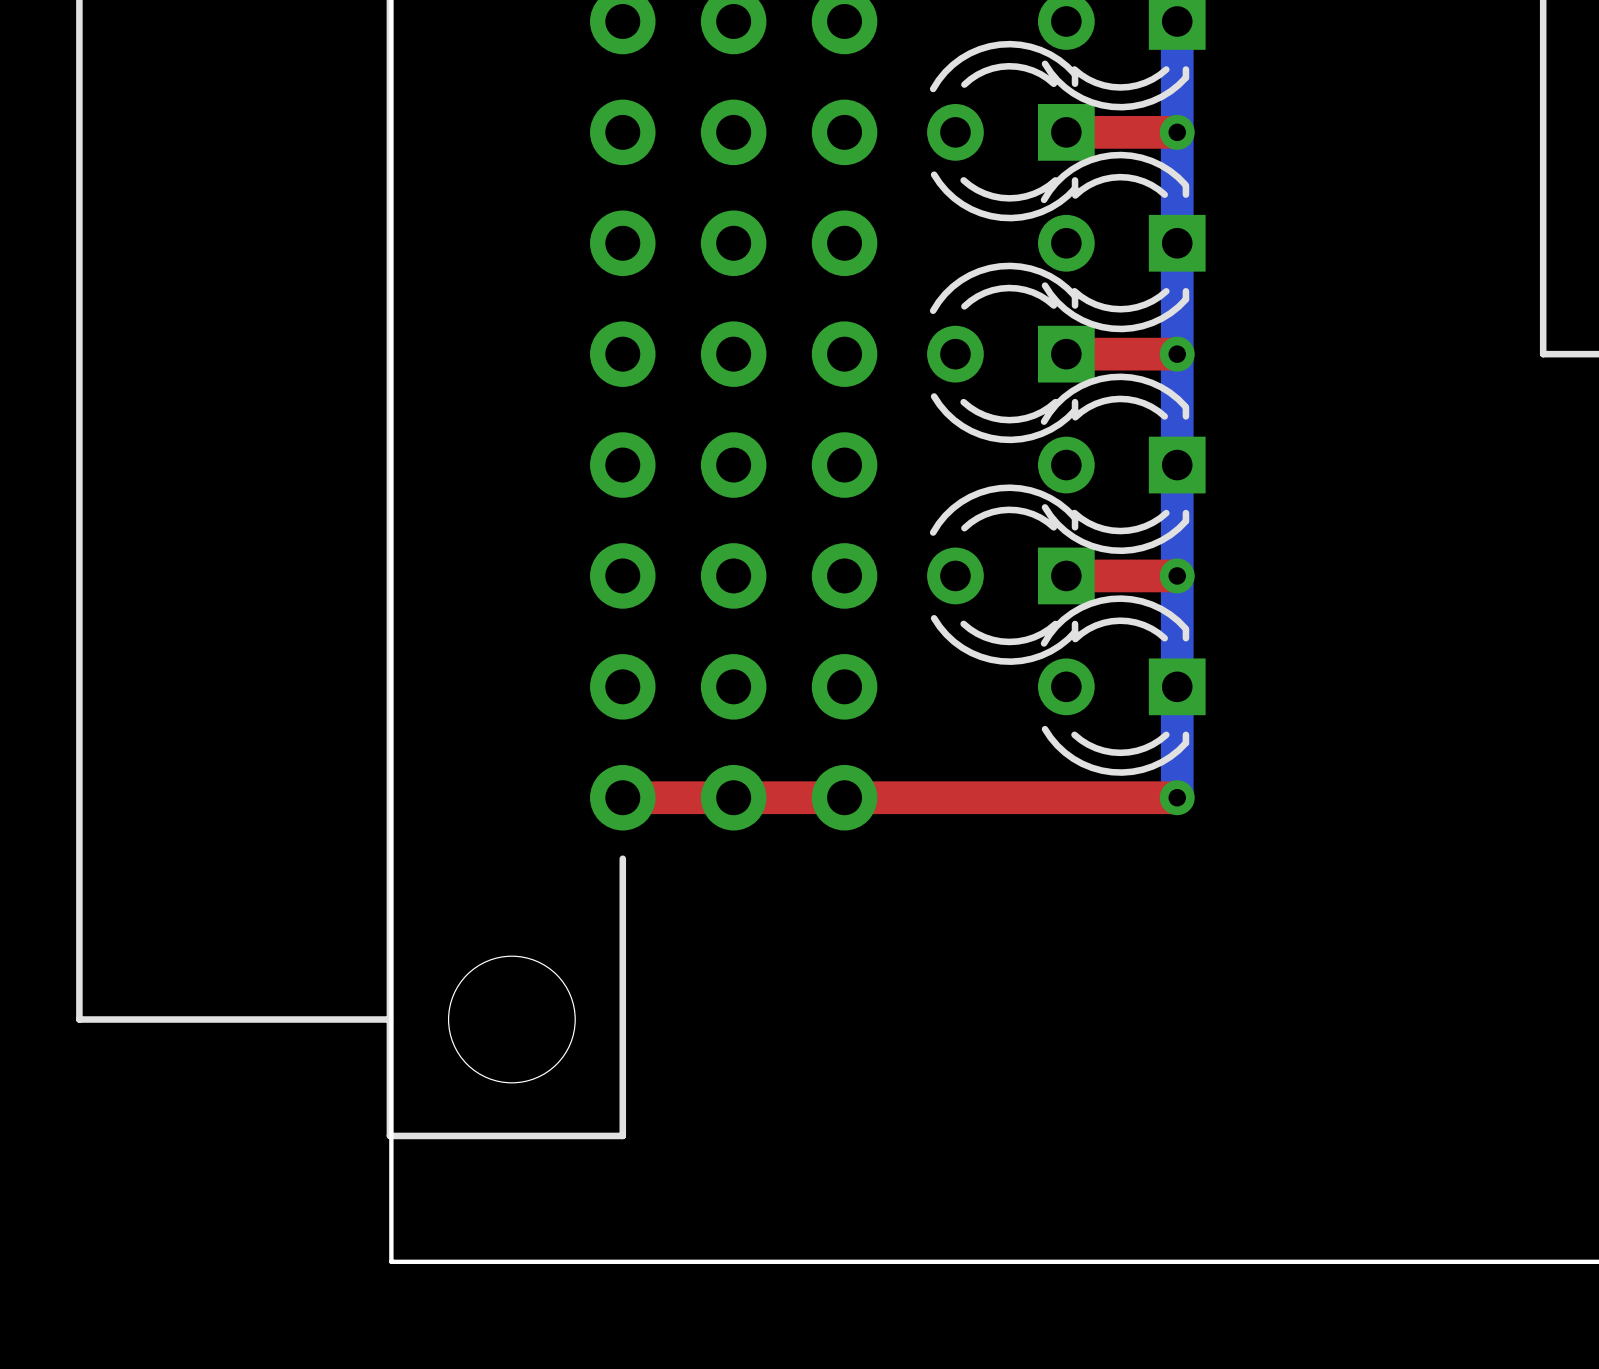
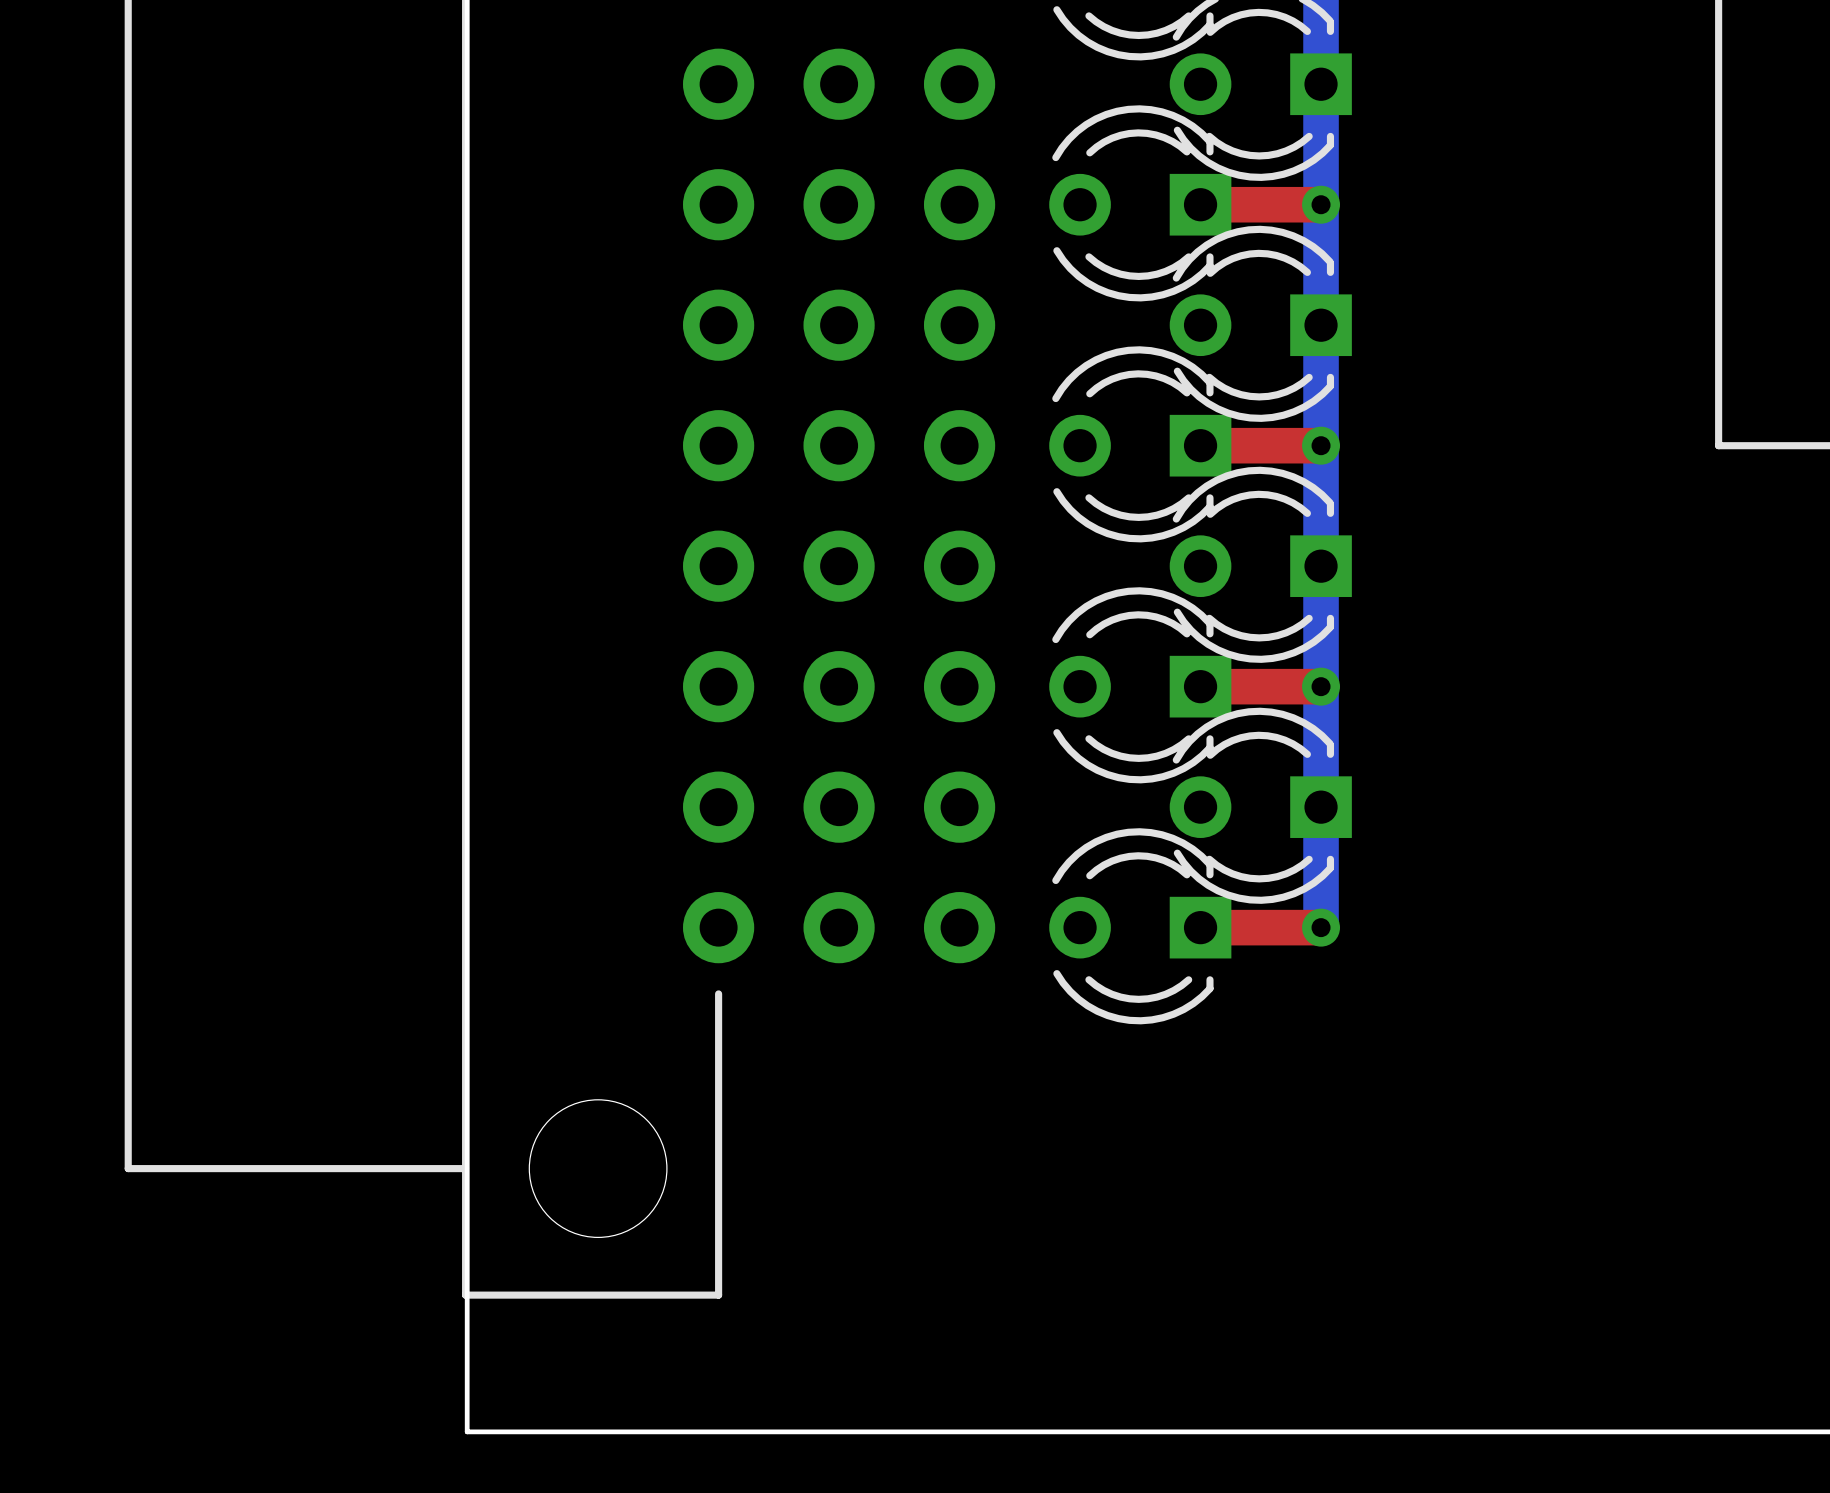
part: none -> (1140, 926)
top track: (622, 797) (1066, 797) -> none

